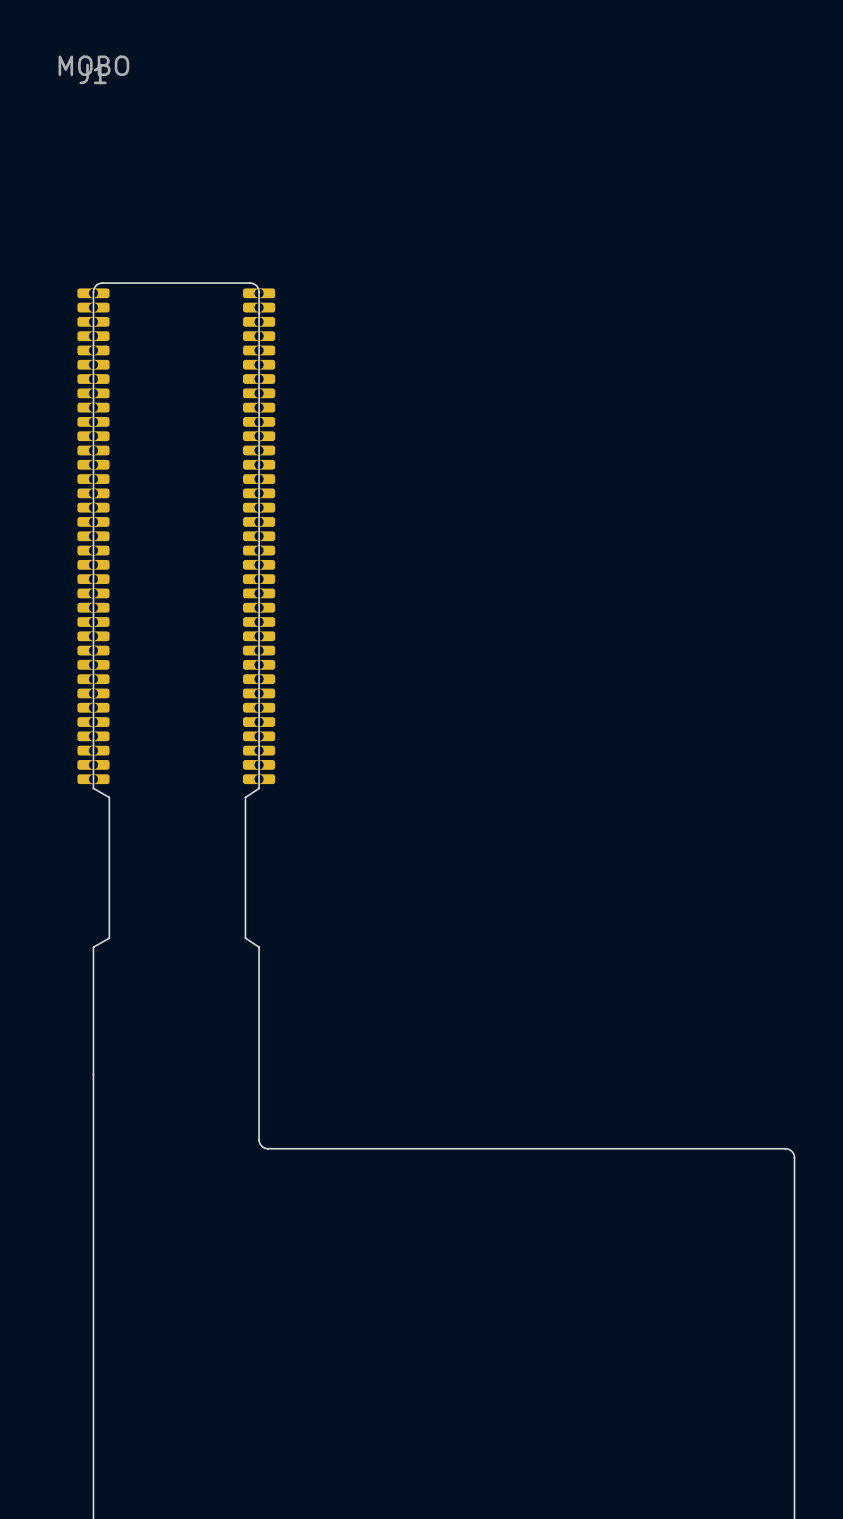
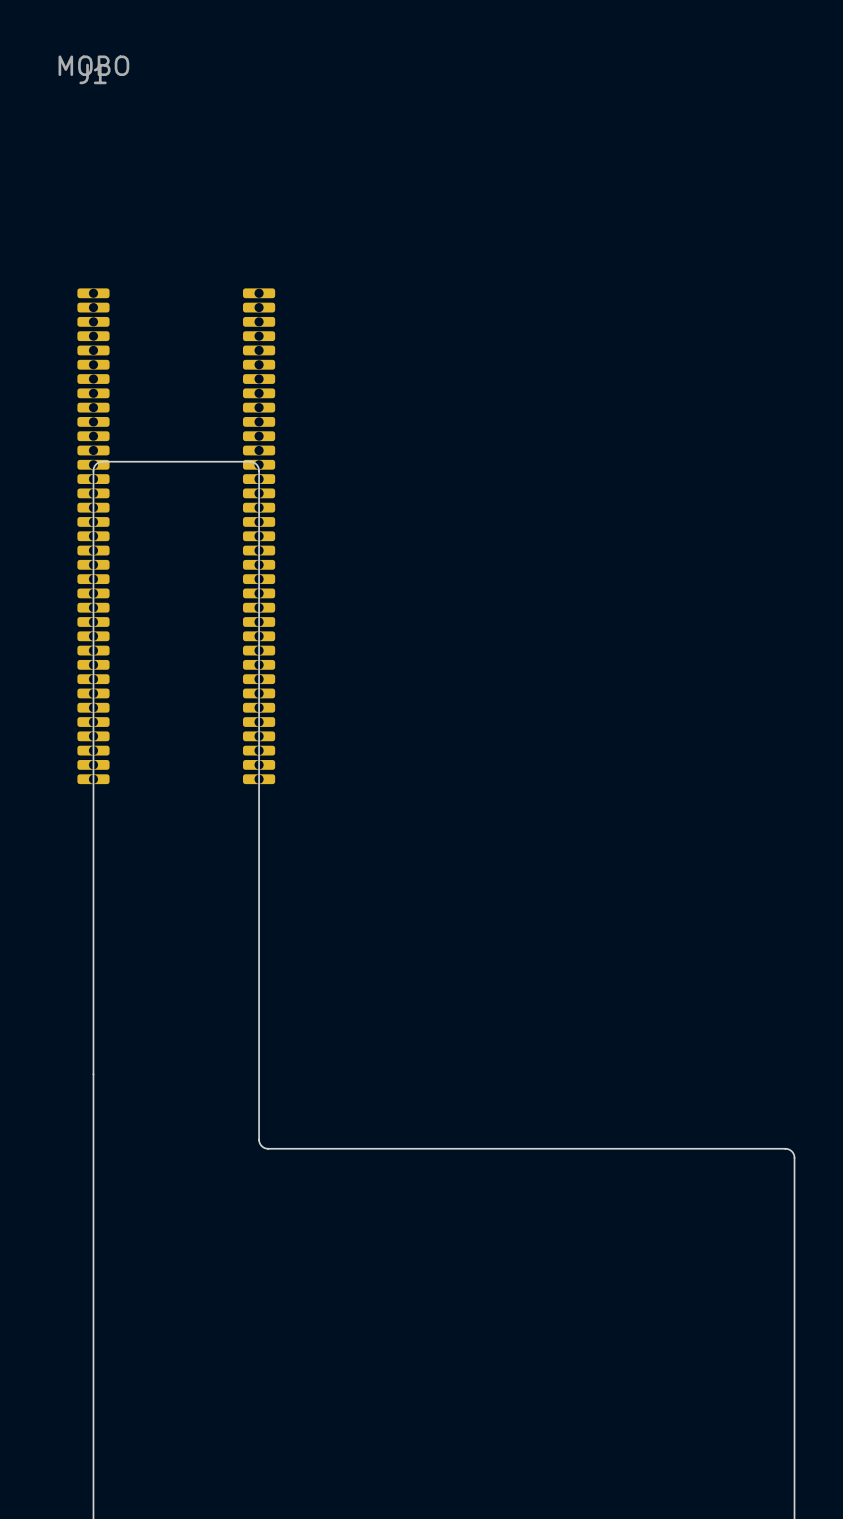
board edge: (93, 470) (93, 292) (96, 285) (102, 283) (250, 283) (257, 286) (259, 292) (259, 470) -> (93, 470) (96, 464) (102, 461) (250, 461) (256, 464) (259, 470)
board edge: (93, 788) (109, 797) (109, 938) (93, 947) -> (93, 788) (93, 947)
board edge: (259, 788) (245, 797) (245, 938) (259, 947) -> (259, 788) (259, 947)

